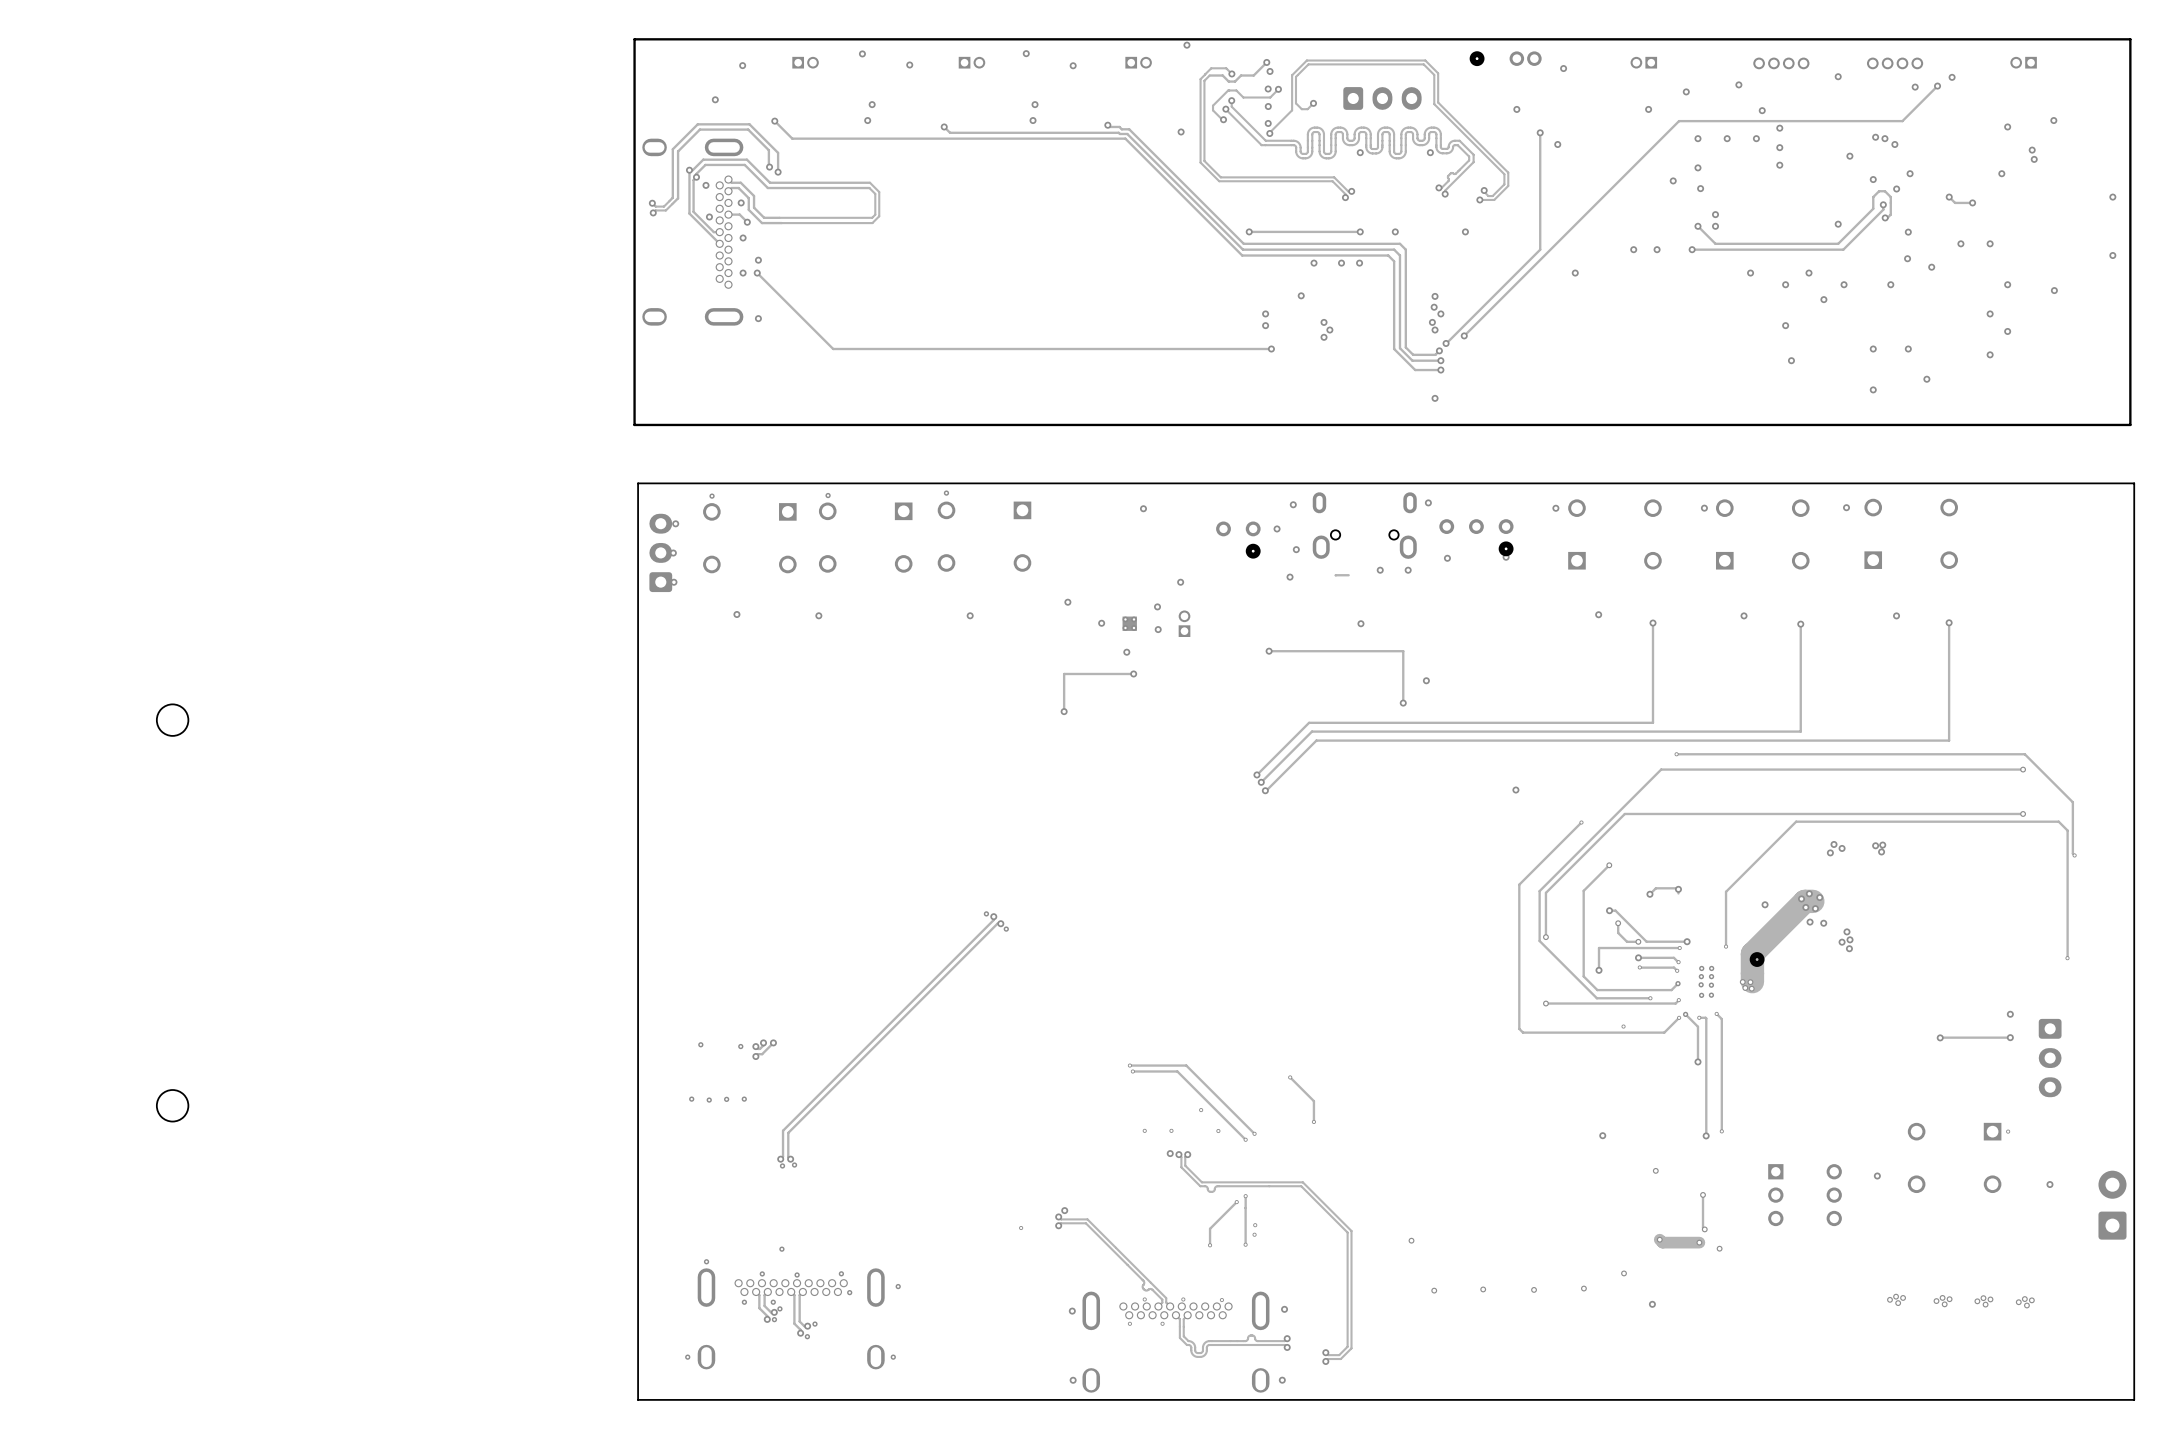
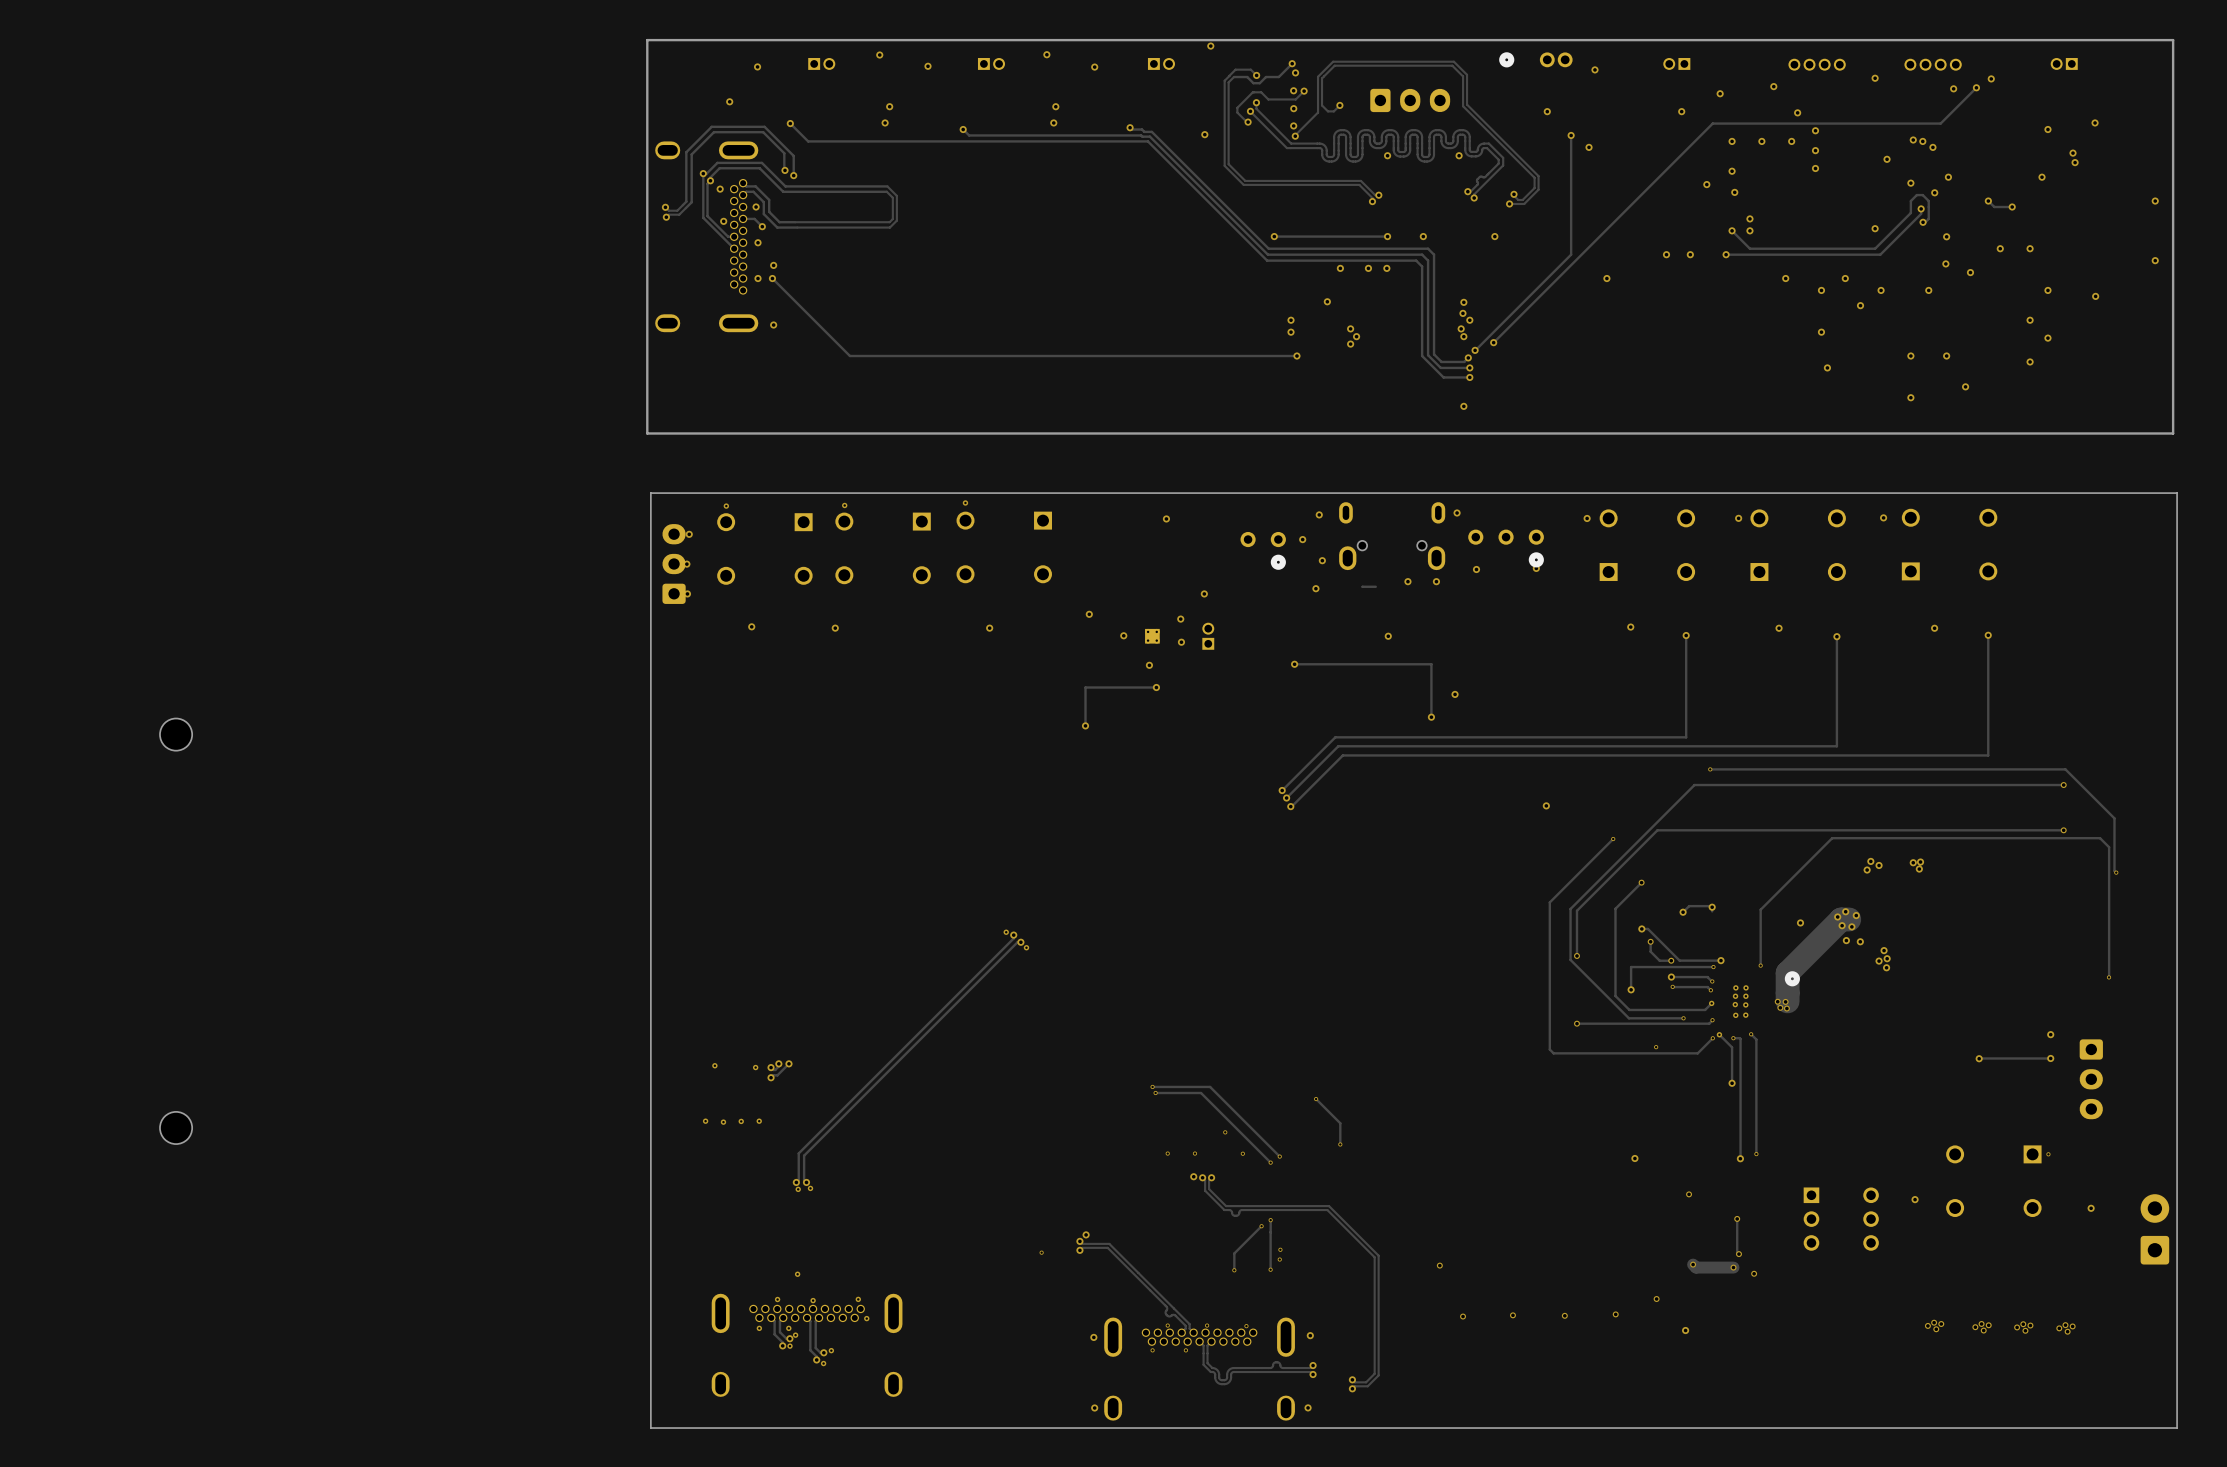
via: (706, 1261) -> none
via: (898, 1286) -> none
via: (687, 1357) -> none
via: (893, 1357) -> none

